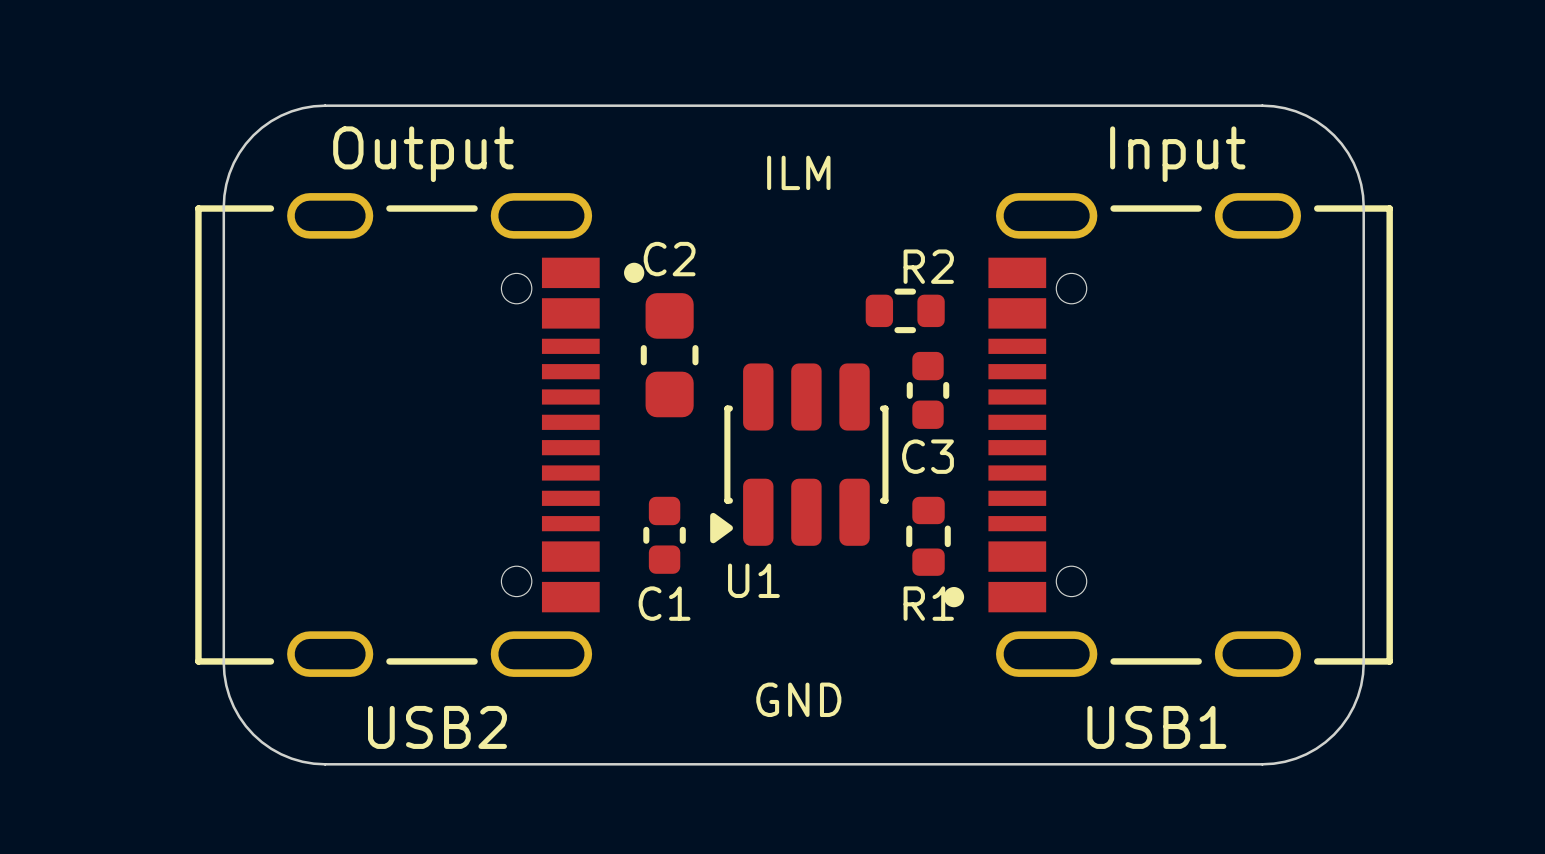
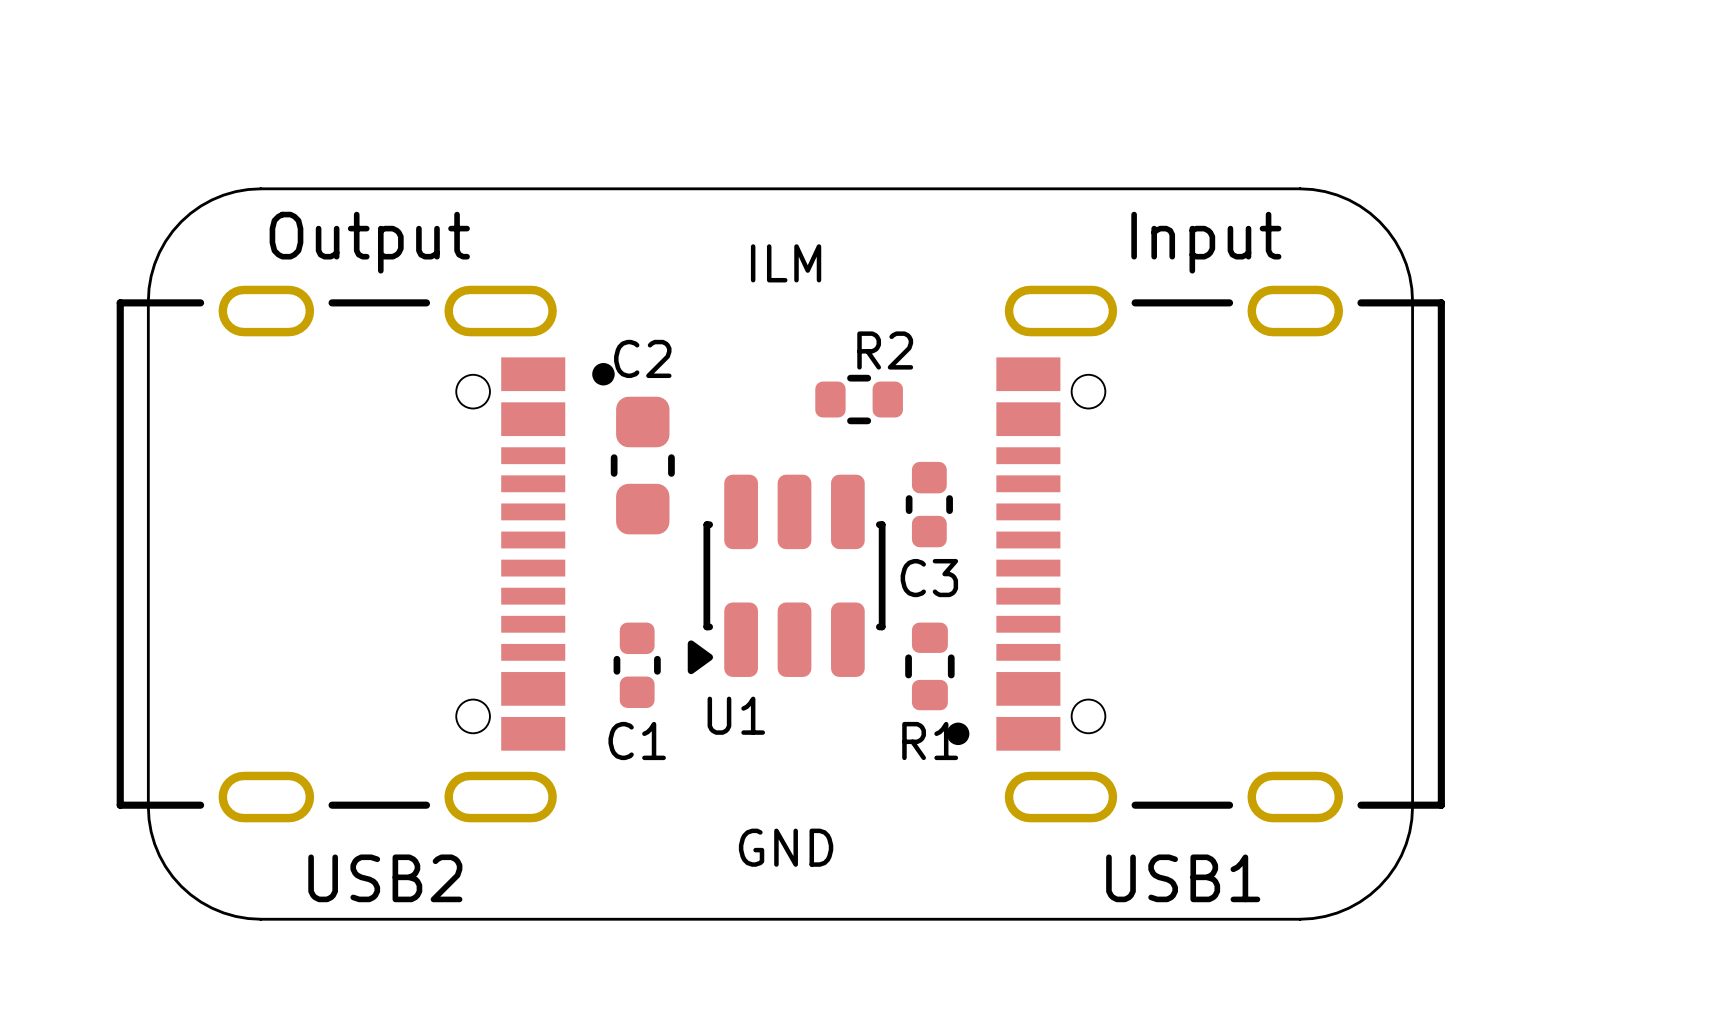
R2 position: (905, 310) -> (859, 399)

